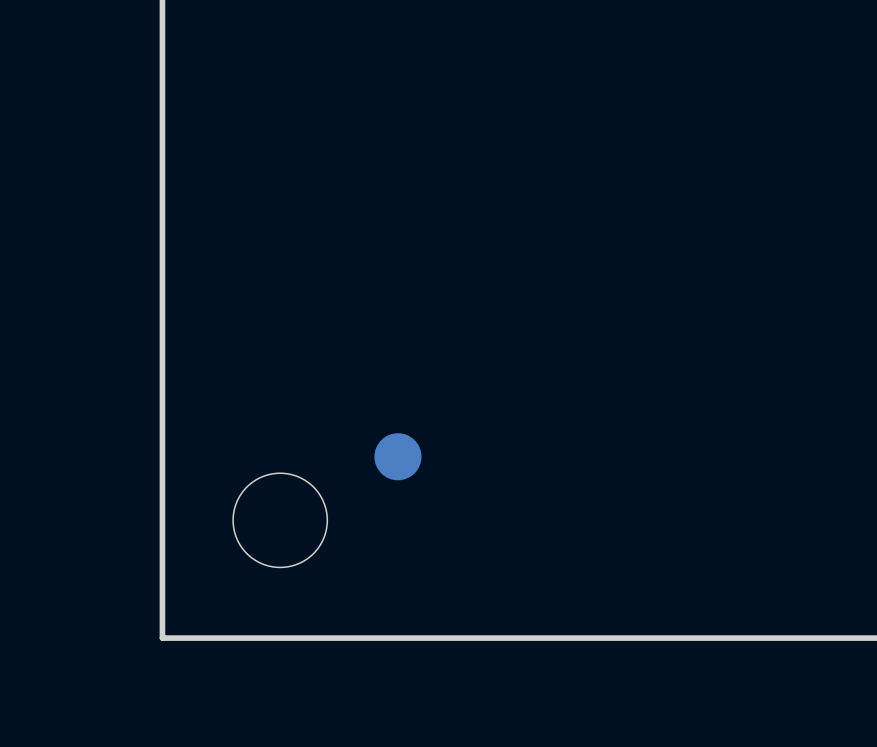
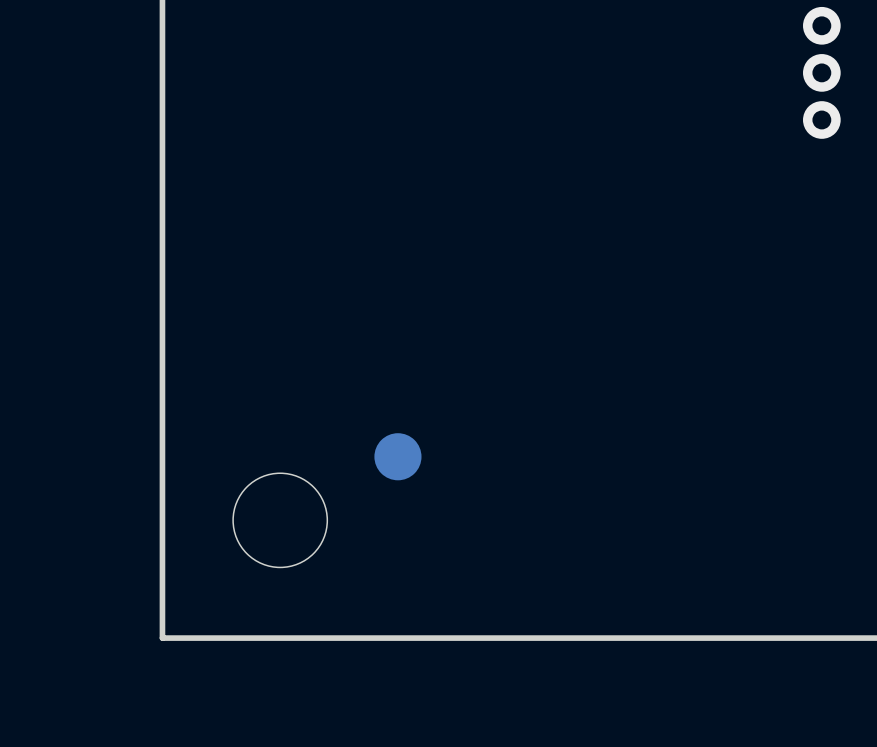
via: none -> (821, 25)
via: none -> (821, 72)
via: none -> (821, 119)

